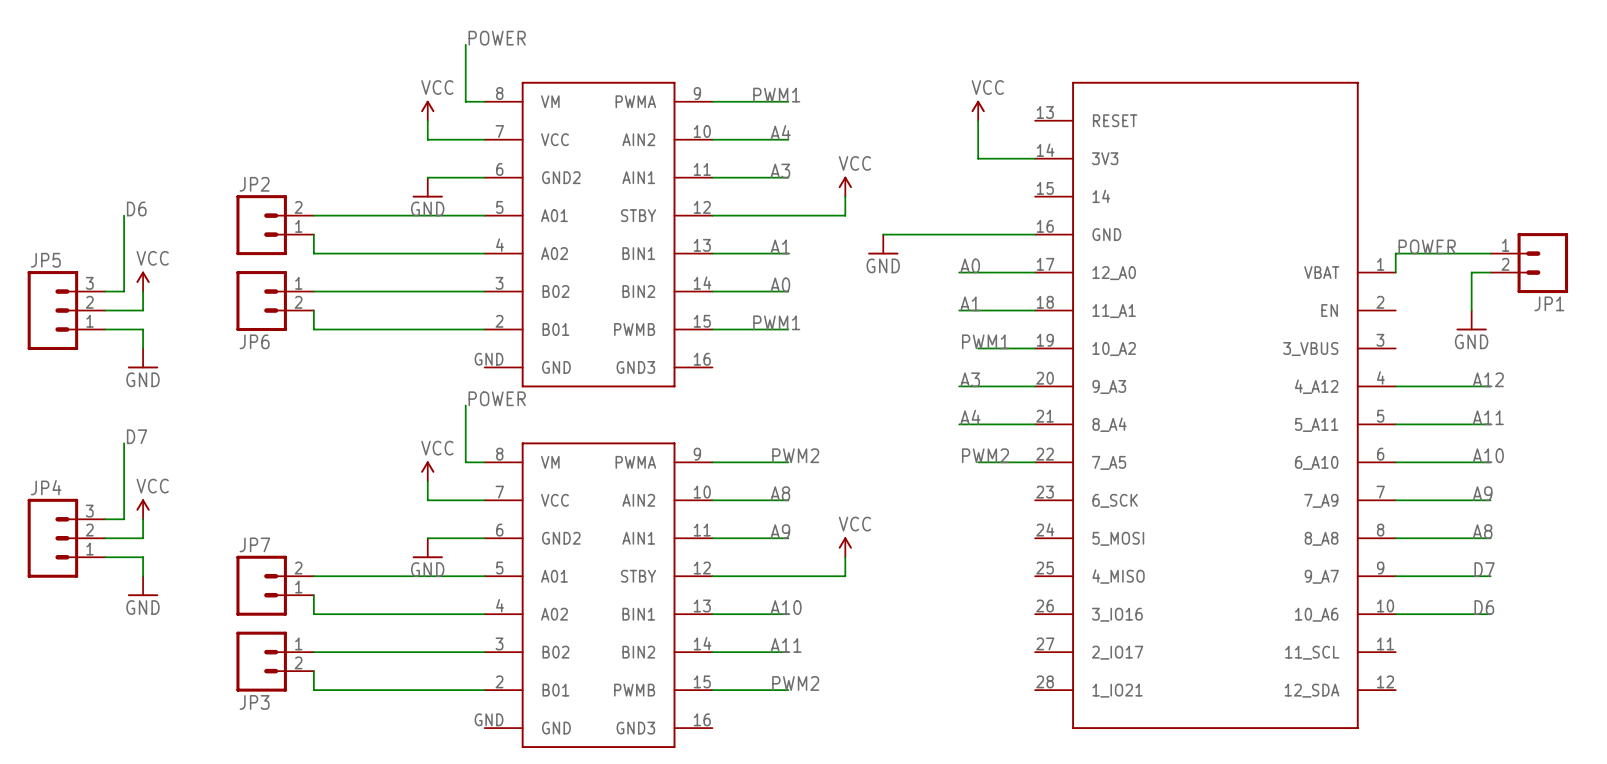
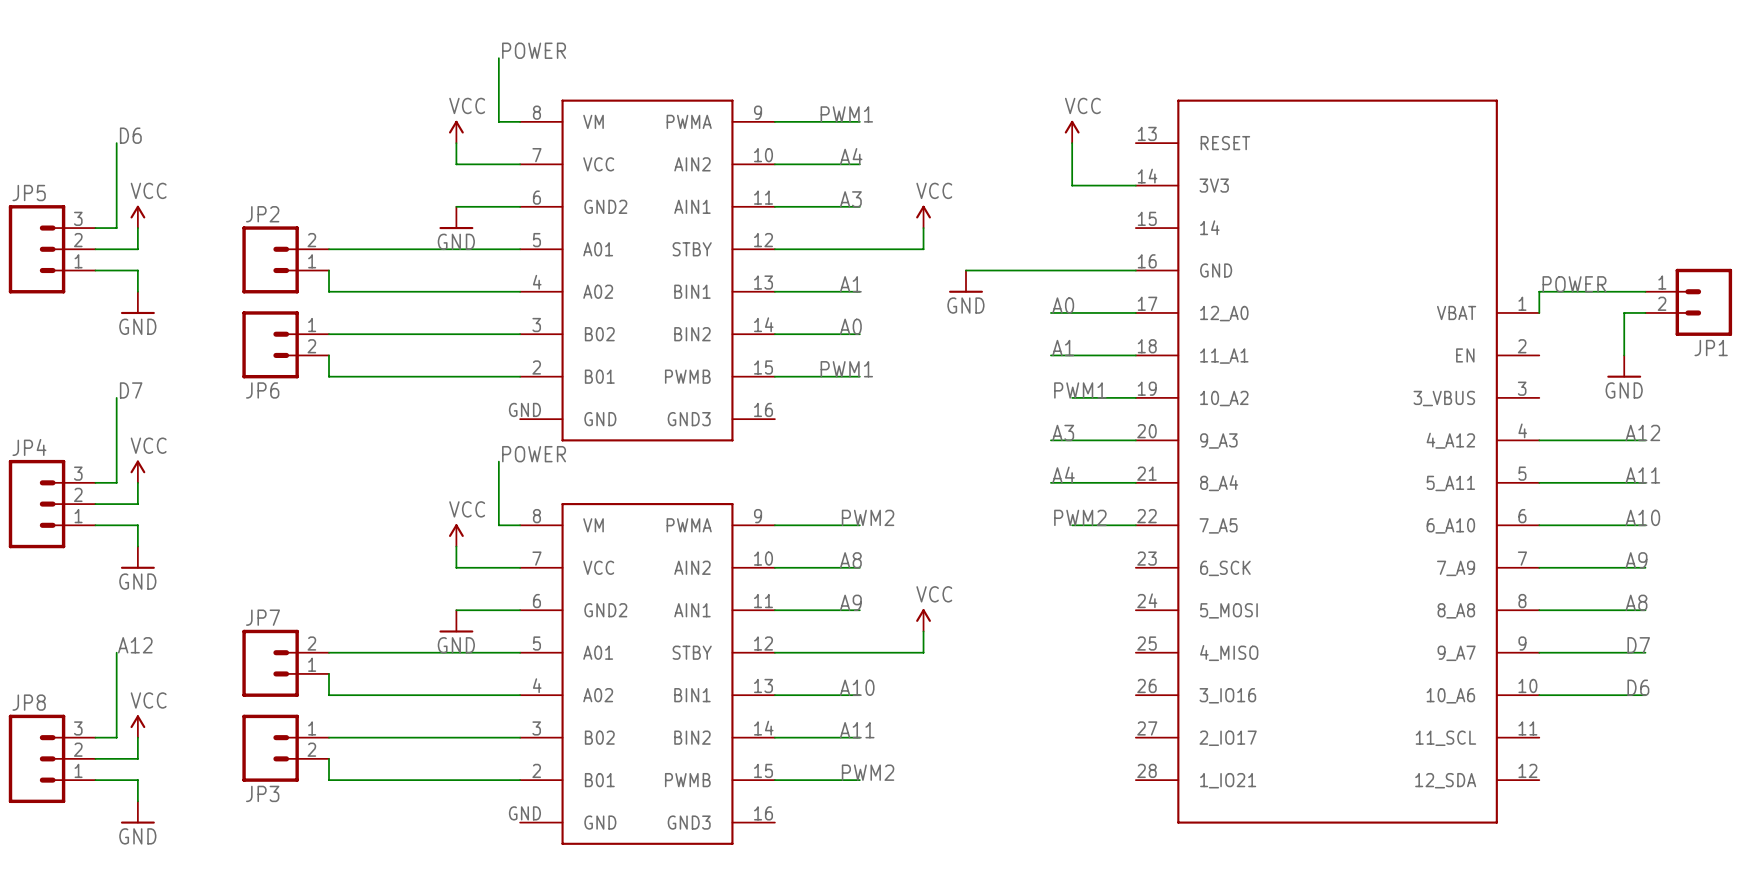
power symbol: none -> VCC (137, 216)
label position: D6 (136, 208) -> D6 (130, 135)
wire: (124, 215) (124, 291) (105, 291) -> (116, 143) (116, 228) (95, 228)
power symbol: none -> GND (137, 302)
power symbol: VCC (143, 281) -> none
wire: (143, 291) (143, 310) (105, 310) -> (137, 228) (137, 249) (95, 249)
JP5 position: (66, 310) -> (52, 249)
wire: (105, 329) (143, 329) (143, 348) -> (95, 270) (137, 270) (137, 291)
power symbol: GND (143, 358) -> none
power symbol: none -> VCC (137, 471)
label position: D7 (137, 436) -> D7 (131, 390)
wire: (124, 443) (124, 519) (105, 519) -> (116, 397) (116, 482) (95, 482)
power symbol: none -> GND (137, 557)
power symbol: VCC (143, 509) -> none
wire: (143, 519) (143, 538) (105, 538) -> (137, 482) (137, 504) (95, 504)
JP4 position: (66, 538) -> (52, 504)
wire: (105, 557) (143, 557) (143, 576) -> (95, 525) (137, 525) (137, 546)
label: none -> A12 (135, 645)
wire: none -> (116, 652) (116, 737) (95, 737)
power symbol: GND (143, 586) -> none
power symbol: none -> VCC (137, 726)
wire: none -> (137, 737) (137, 758) (95, 758)
JP8: none -> (52, 758)
wire: none -> (95, 780) (137, 780) (137, 801)
power symbol: none -> GND (137, 812)

